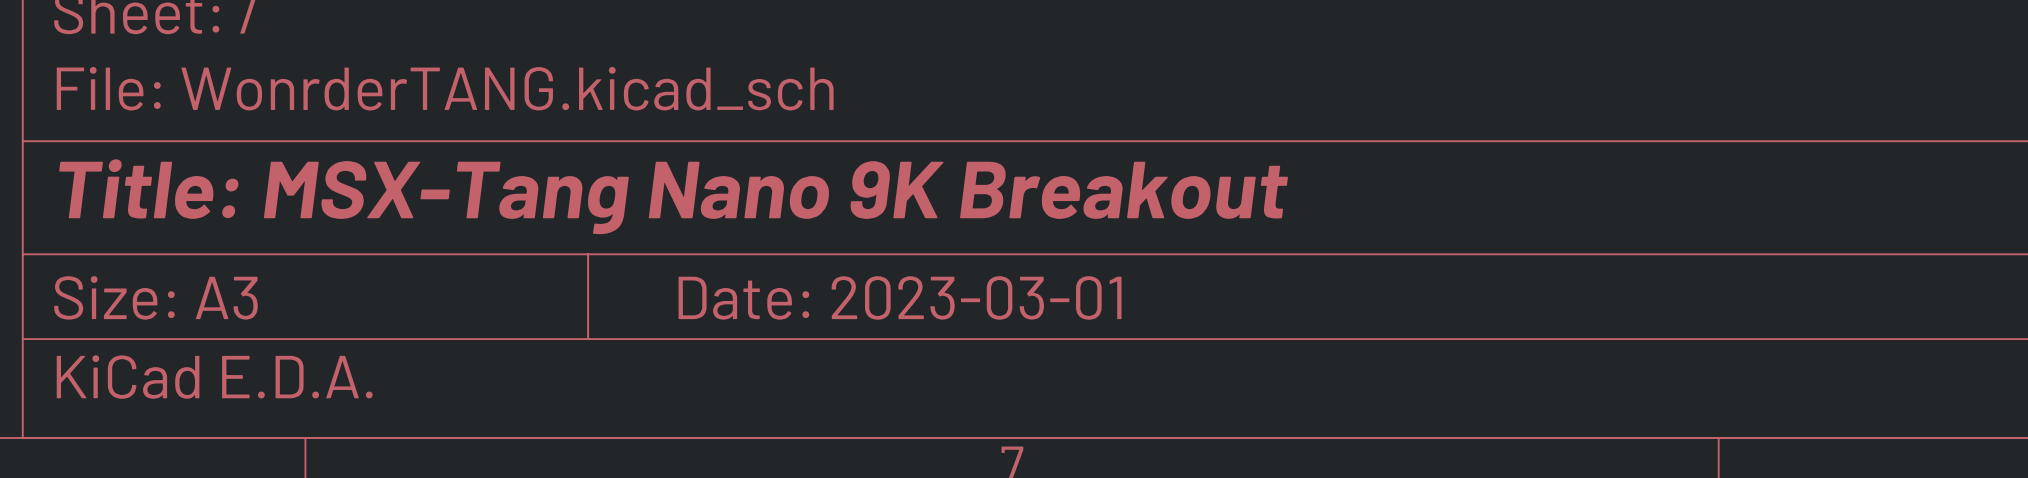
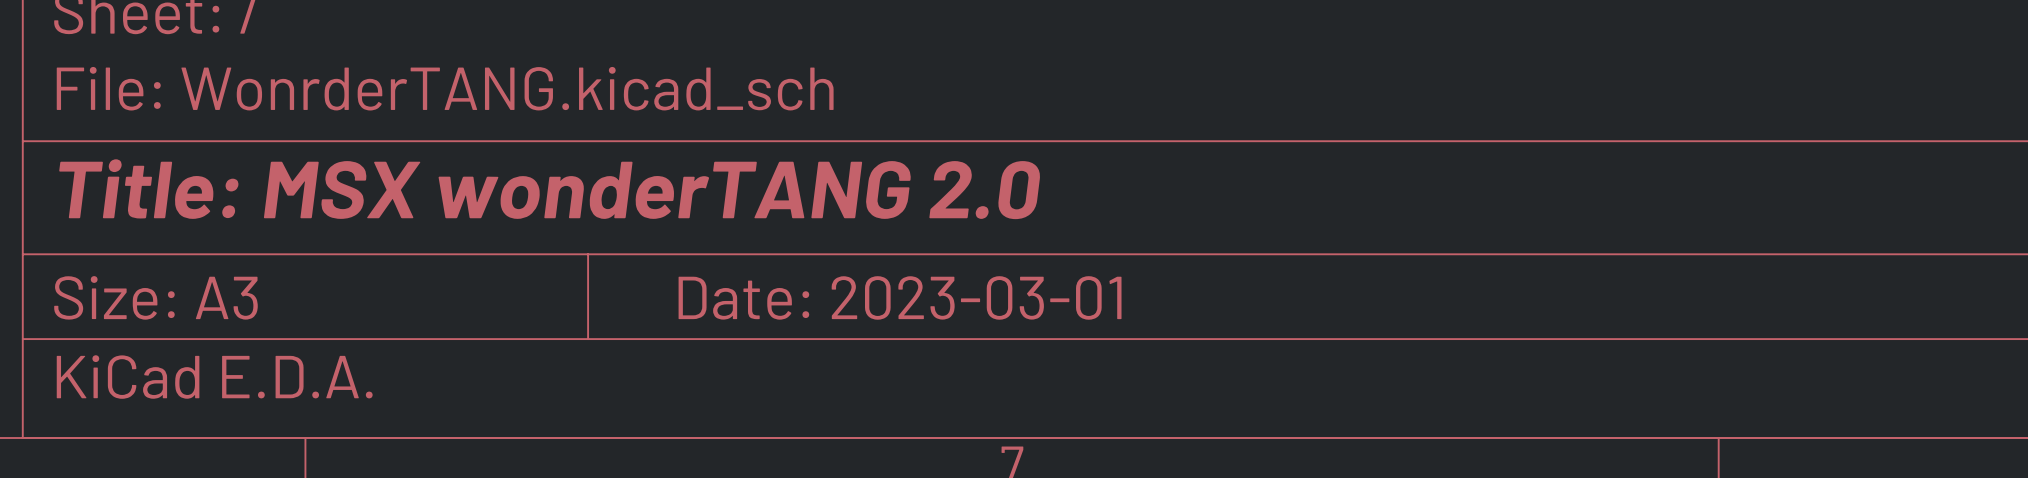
title block: Title: MSX-Tang Nano 9K Breakout (673, 196) -> Title: MSX wonderTANG 2.0 (550, 189)

